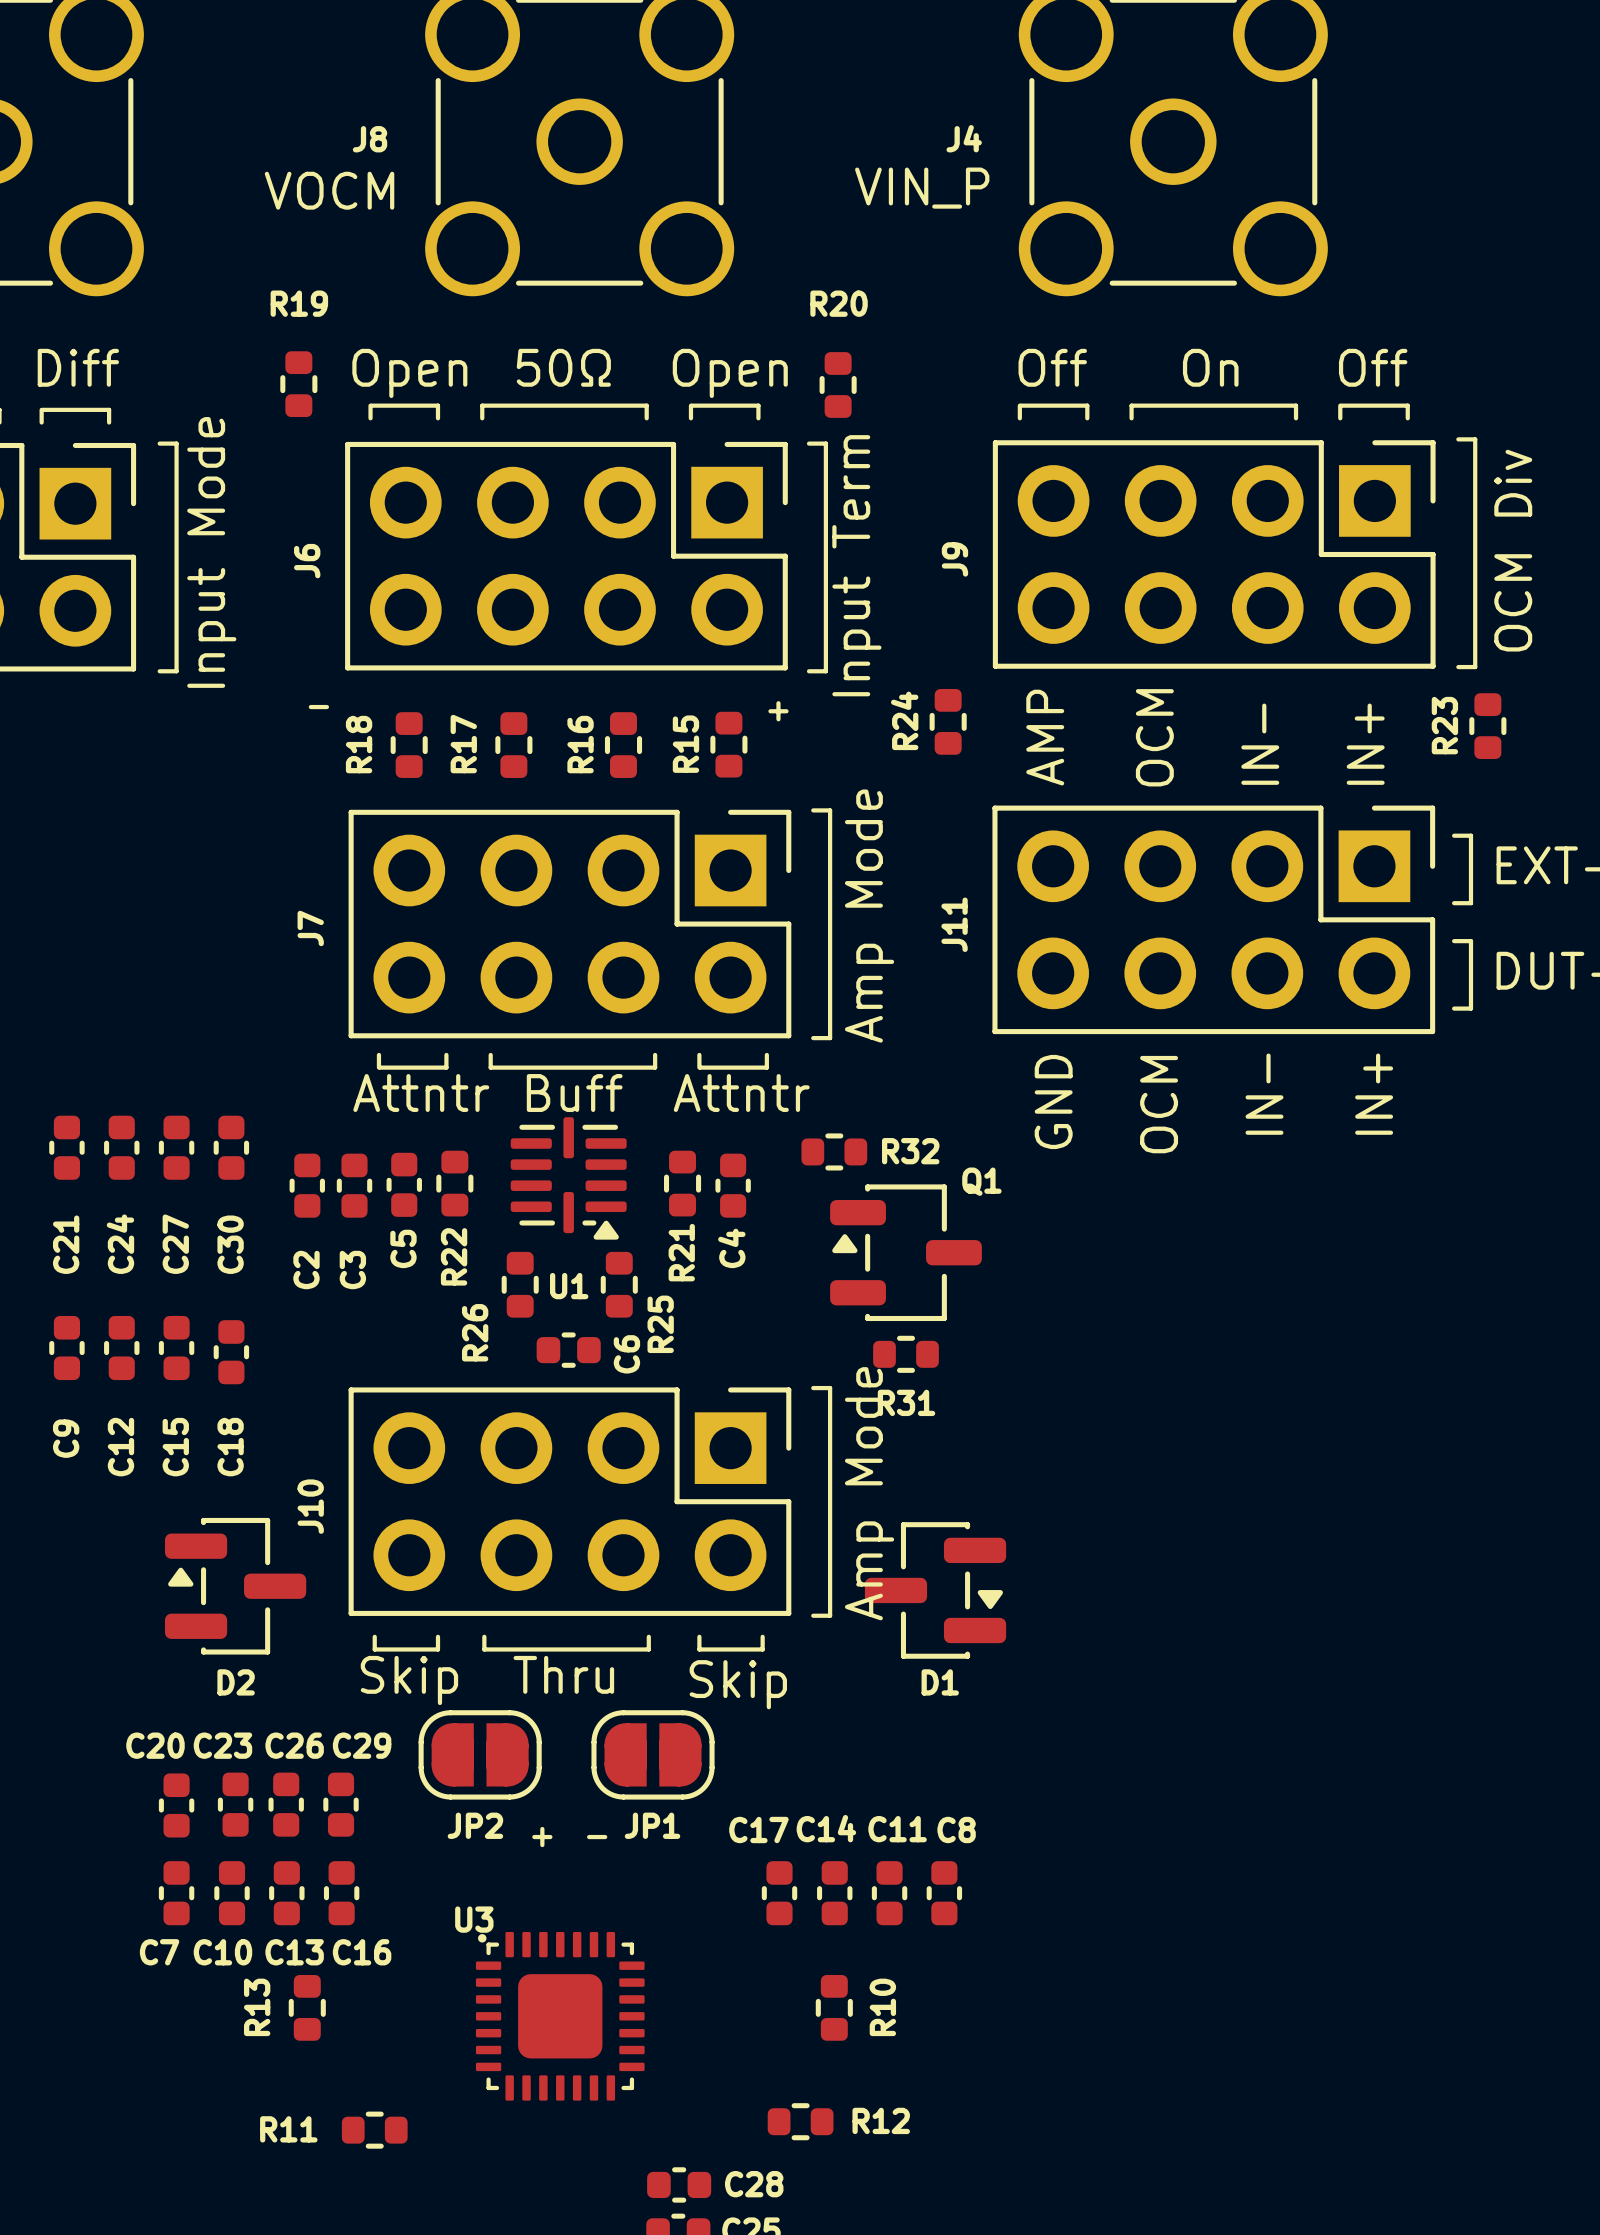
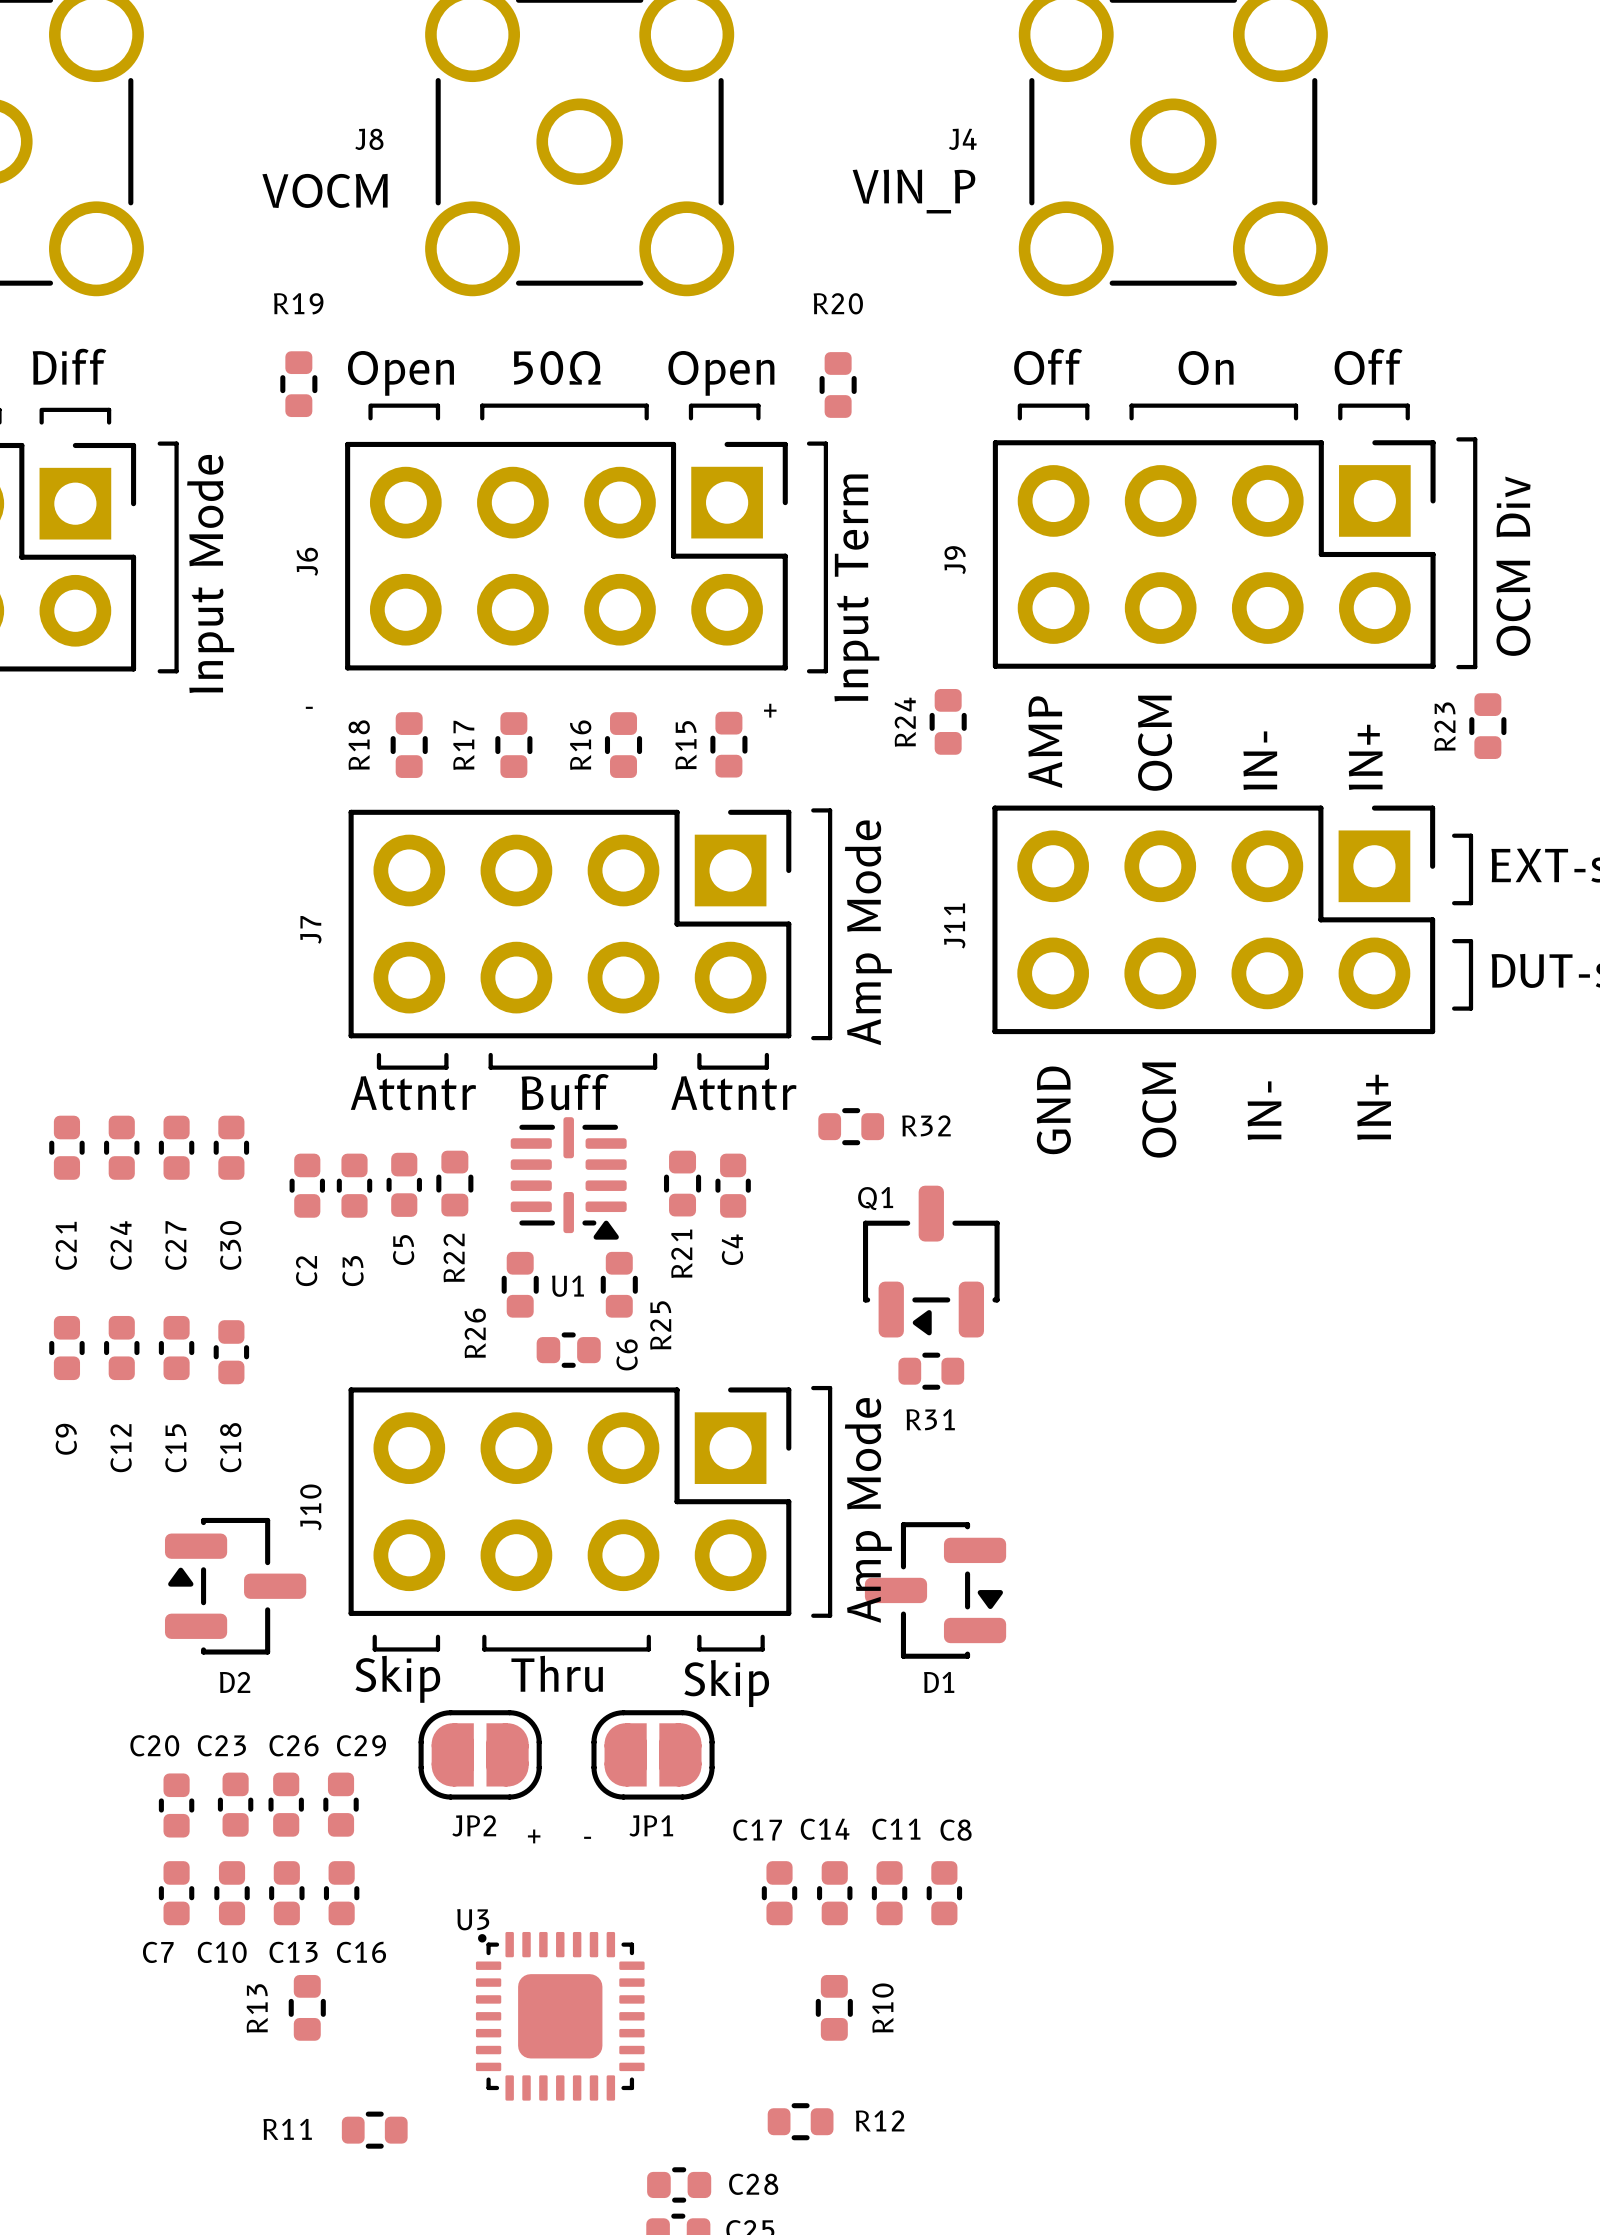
R32 position: (834, 1151) -> (851, 1126)
Q1 rotation: 0° (906, 1252) -> 90° counterclockwise (931, 1261)
R31 position: (906, 1354) -> (931, 1371)

